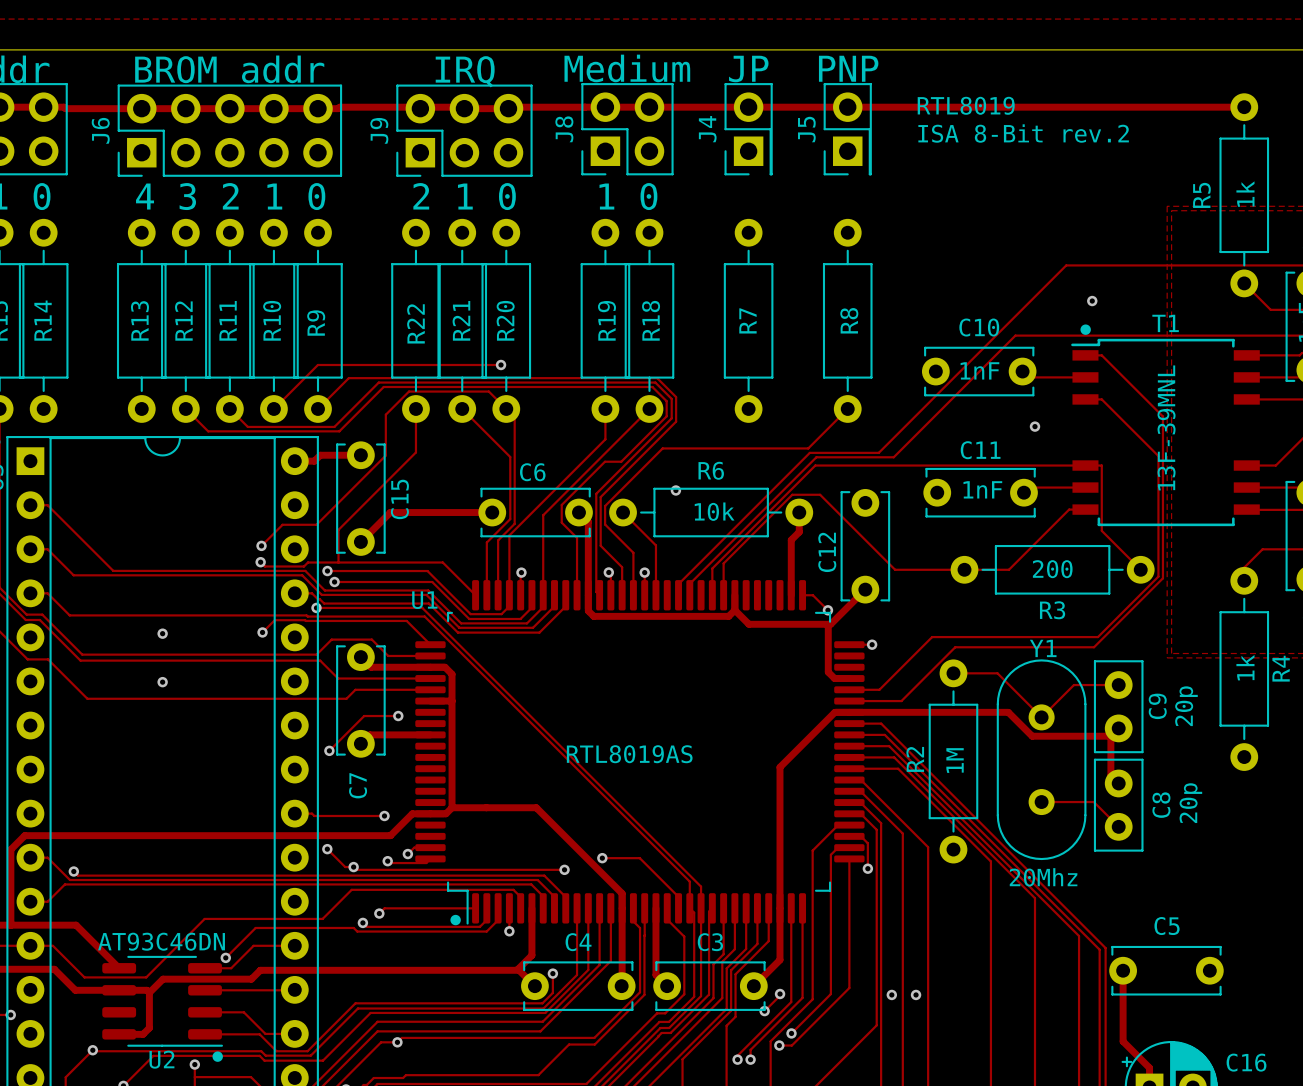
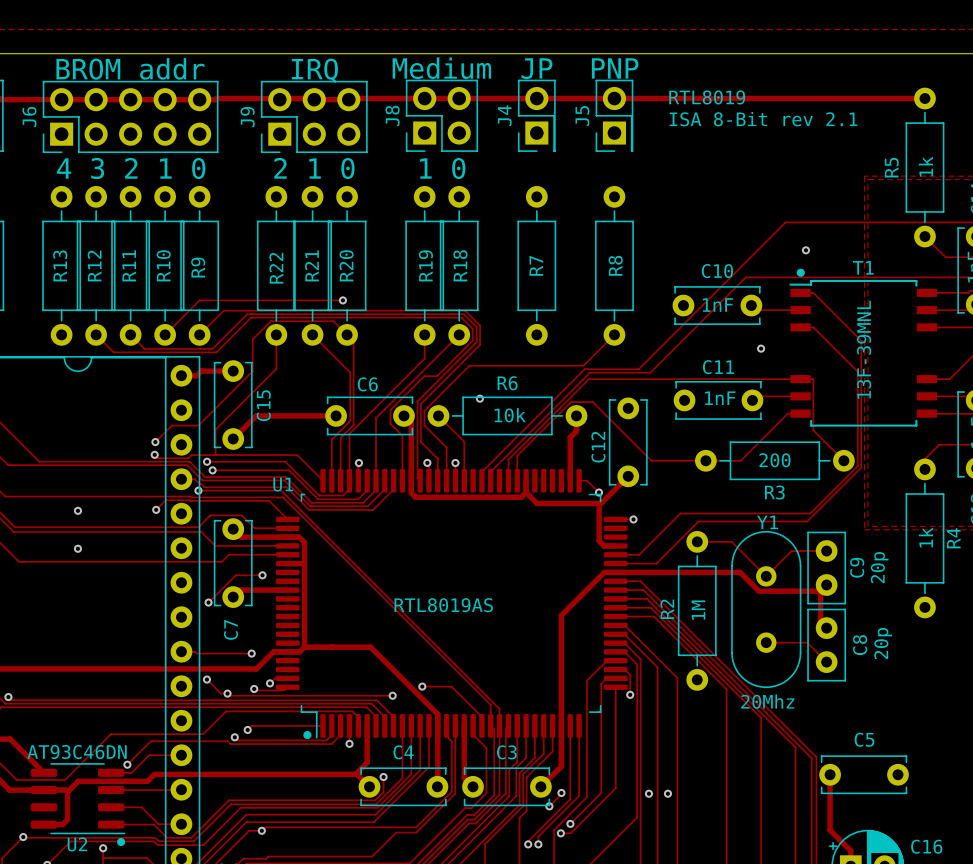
text: ISA 8-Bit rev.2 (1023, 133) -> ISA 8-Bit rev 2.1 (763, 119)

